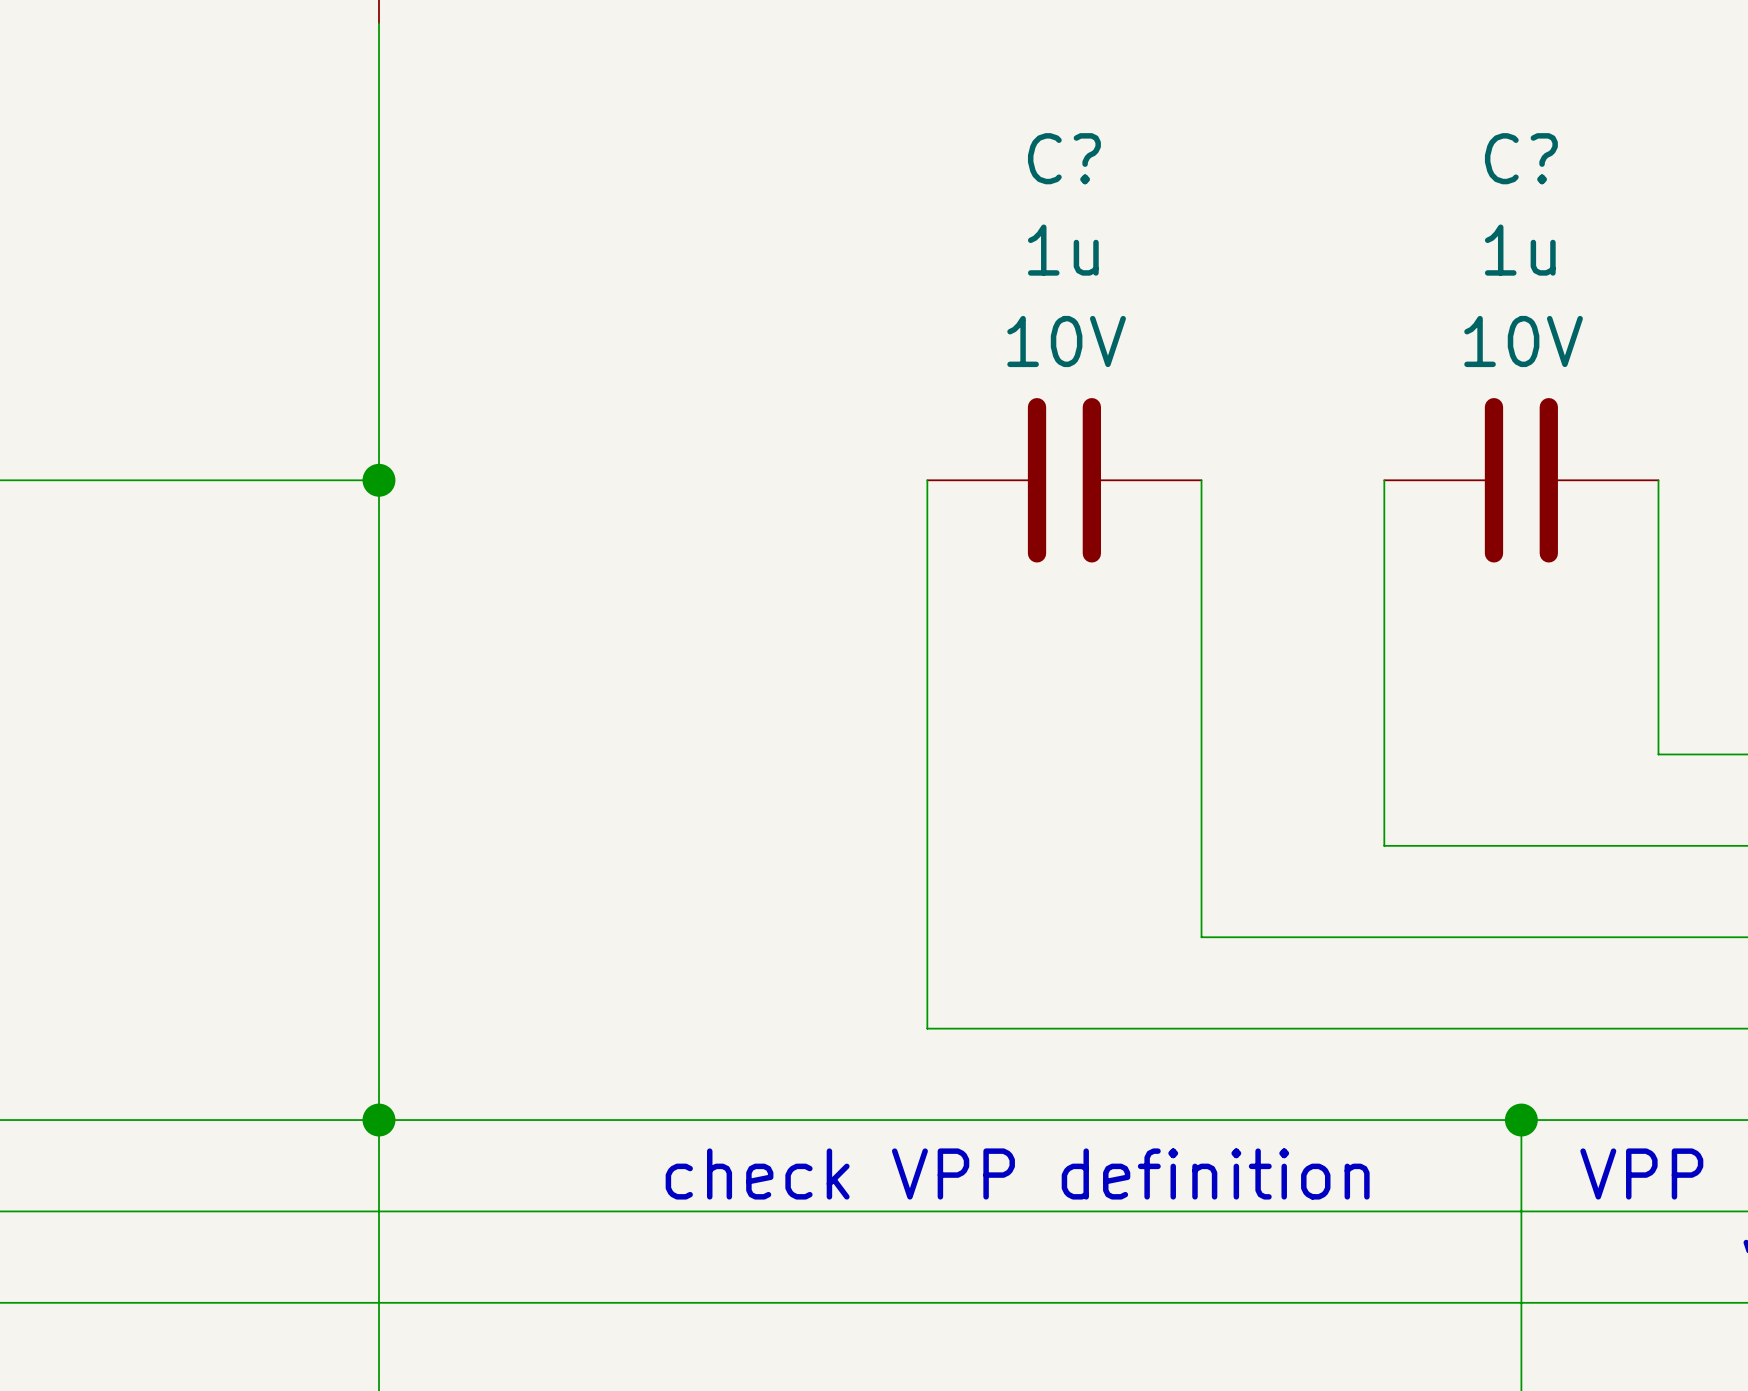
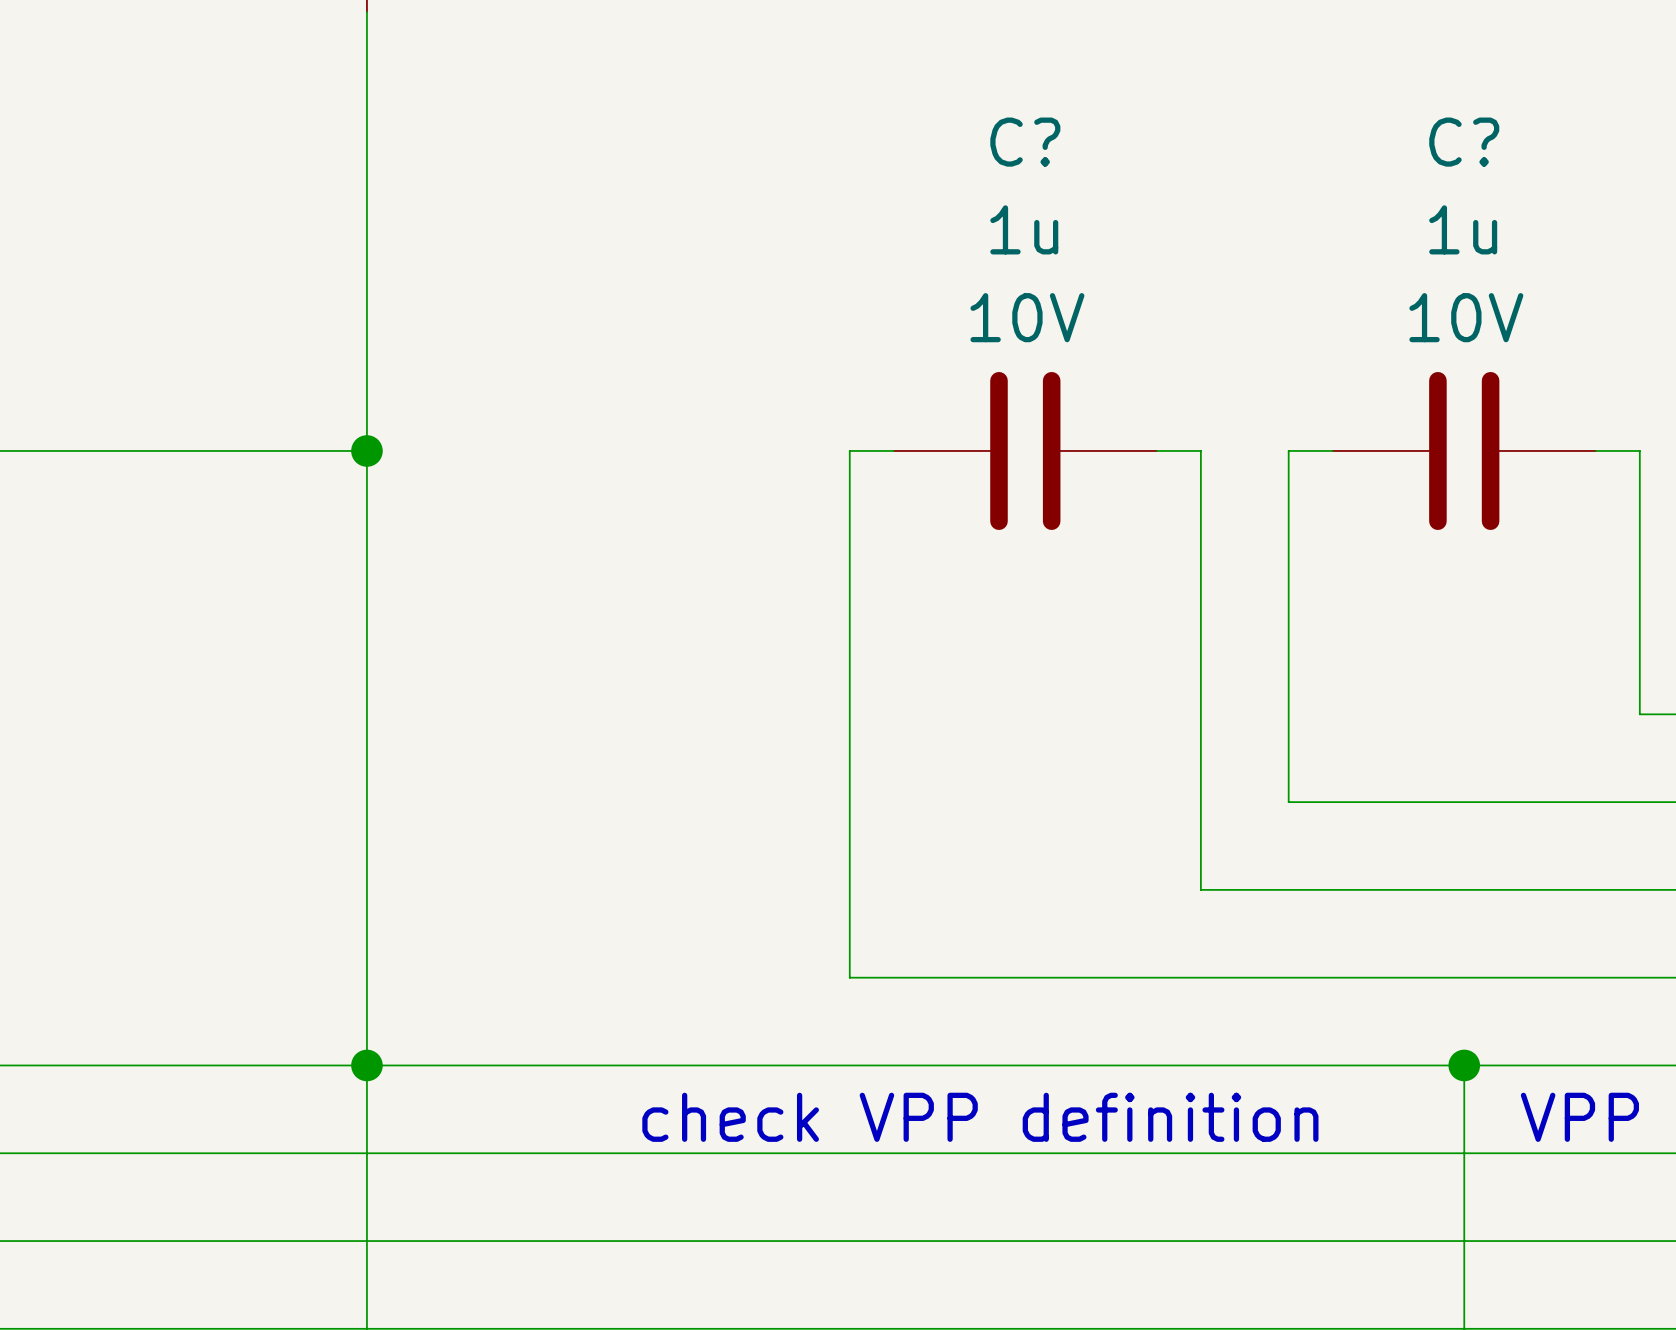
wire: (927, 480) (927, 1028) -> (893, 450) (849, 450) (849, 977) (893, 977)
wire: (1201, 480) (1201, 937) (1247, 937) -> (1157, 450) (1200, 450) (1200, 889)
wire: (1384, 480) (1384, 845) -> (1332, 450) (1288, 450) (1288, 802) (1332, 802)
wire: (1658, 480) (1658, 754) (1704, 754) -> (1595, 450) (1639, 450) (1639, 714)

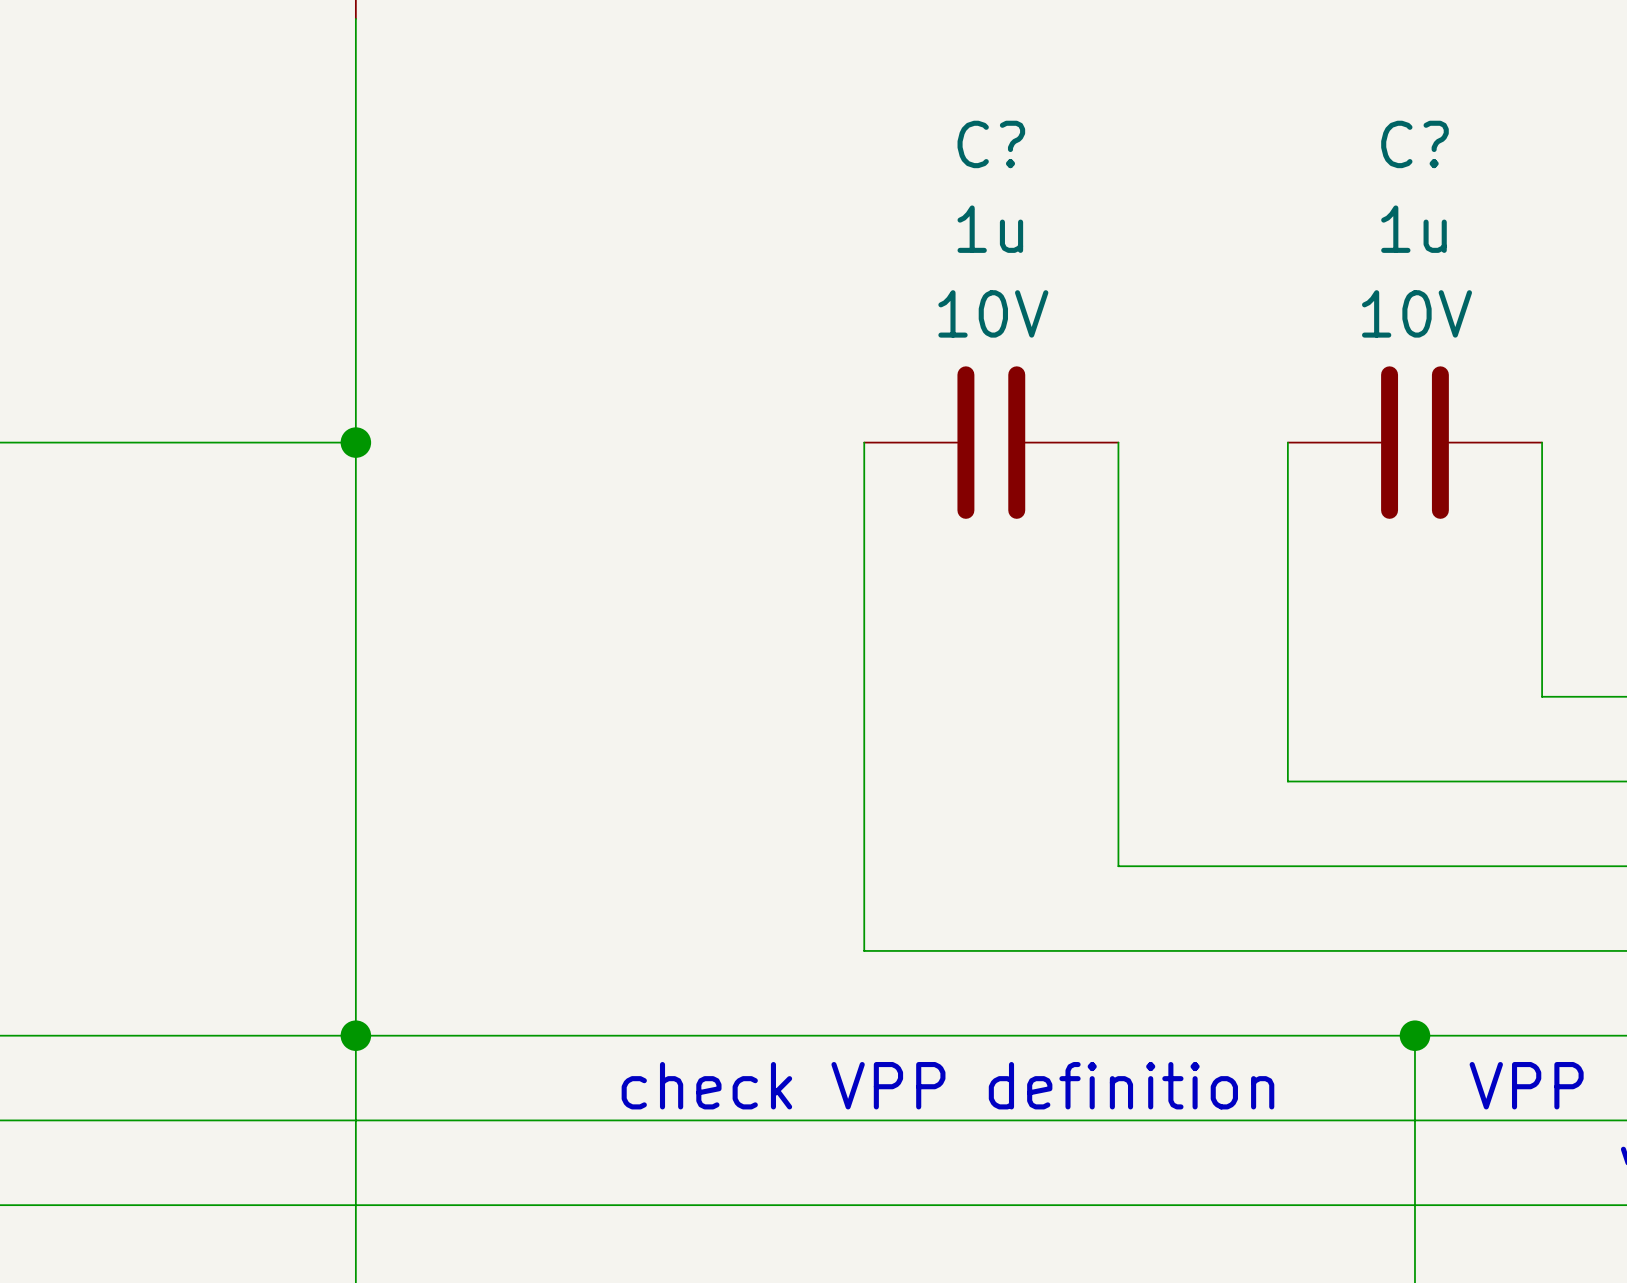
wire: (893, 450) (849, 450) (849, 977) (893, 977) -> (864, 442) (864, 950)
wire: (1157, 450) (1200, 450) (1200, 889) -> (1118, 442) (1118, 866) (1160, 866)
wire: (1332, 450) (1288, 450) (1288, 802) (1332, 802) -> (1287, 442) (1287, 781)
wire: (1595, 450) (1639, 450) (1639, 714) -> (1542, 442) (1542, 696) (1584, 696)

